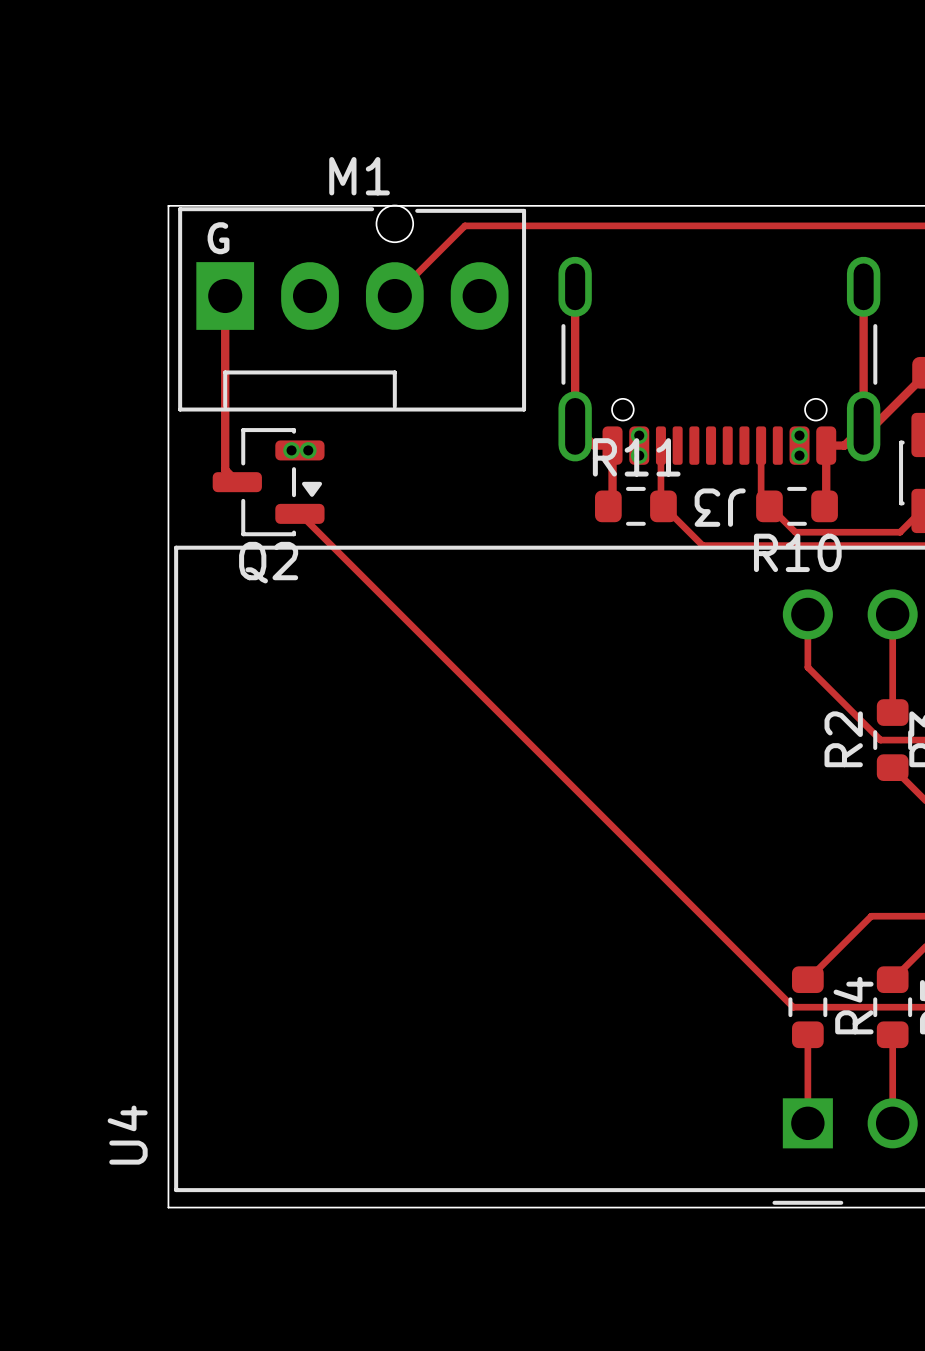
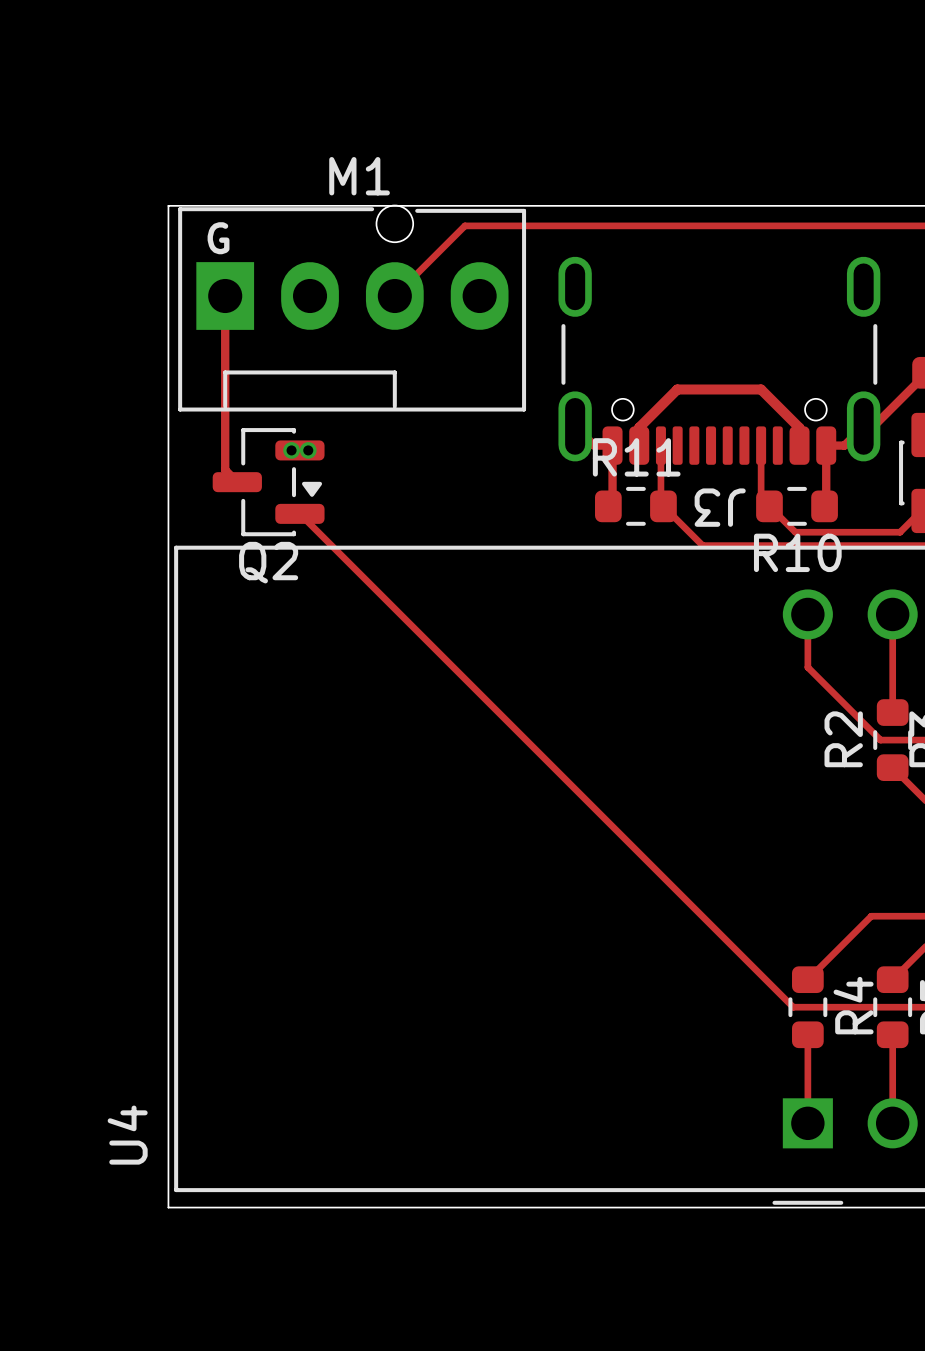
track: (575, 286) (575, 426) -> none
track: (863, 286) (863, 426) -> none
via: (639, 435) -> none
via: (799, 435) -> none
track: none -> (639, 445) (639, 427) (677, 389) (761, 389) (799, 427) (799, 445)
via: (639, 455) -> none
via: (799, 455) -> none

